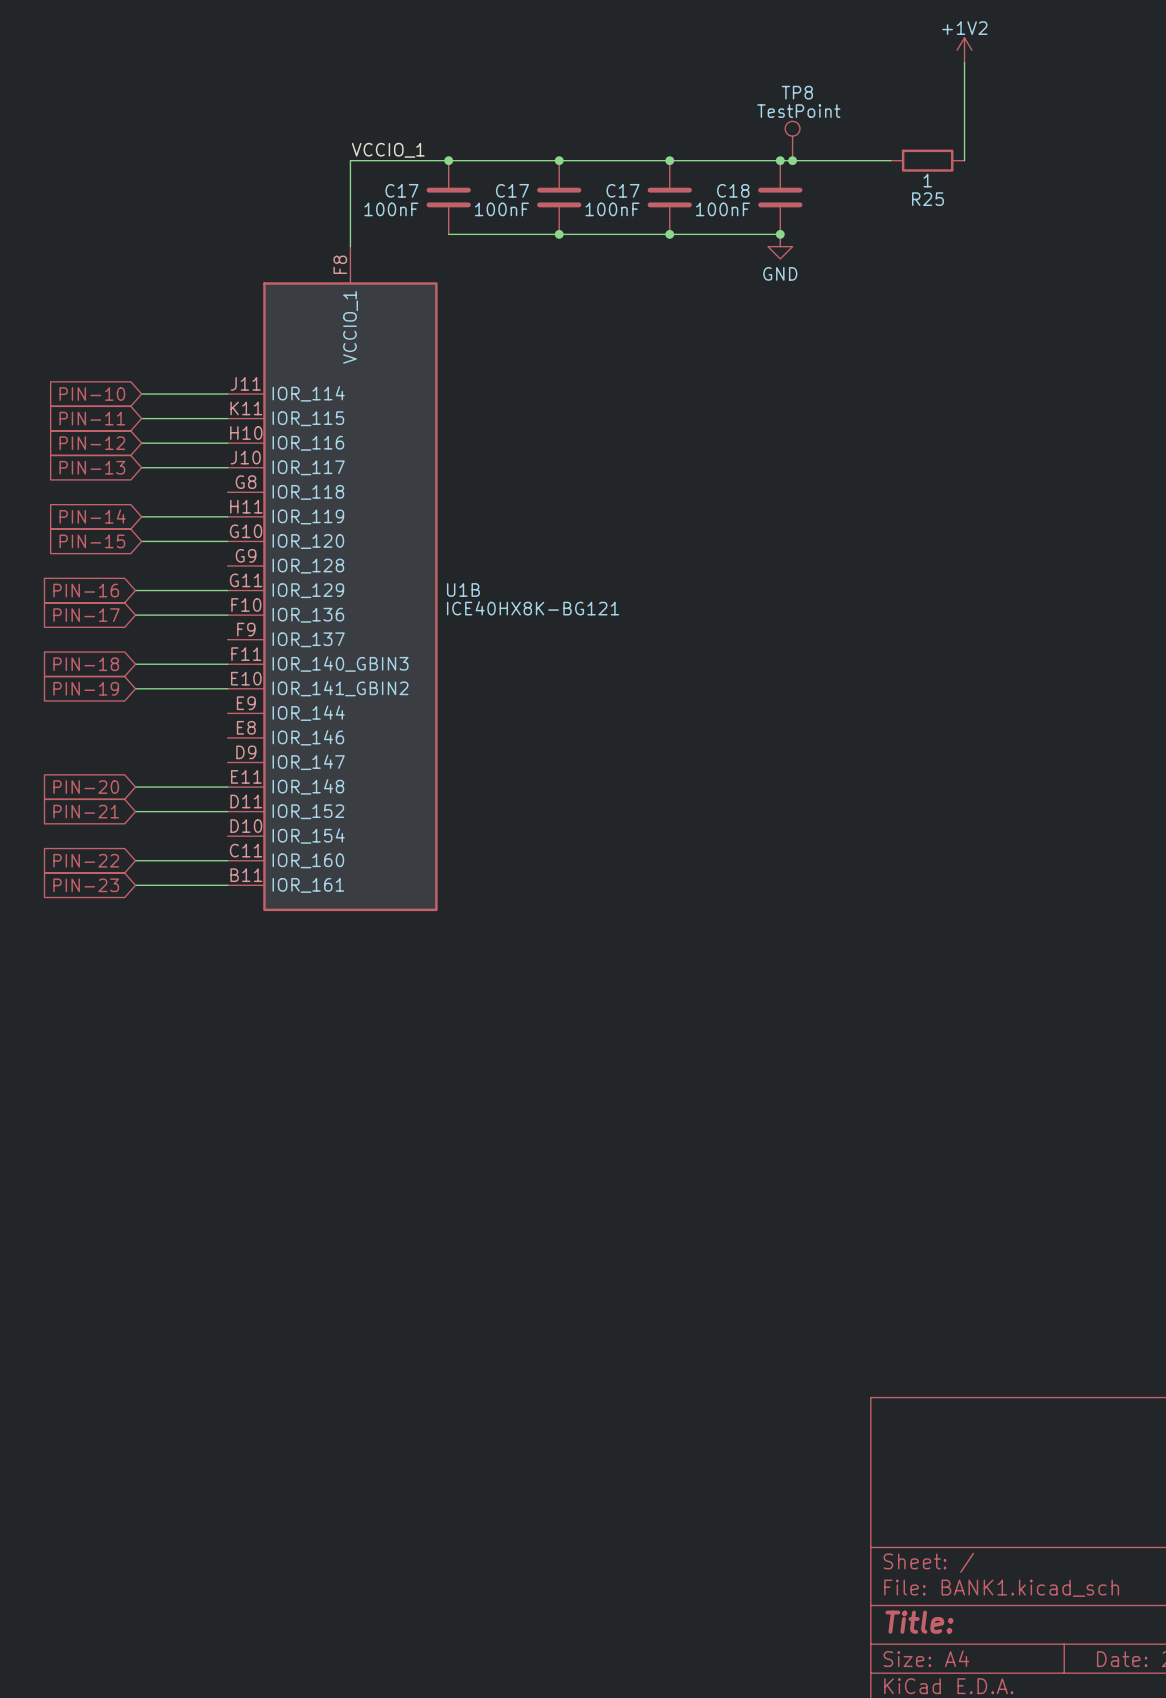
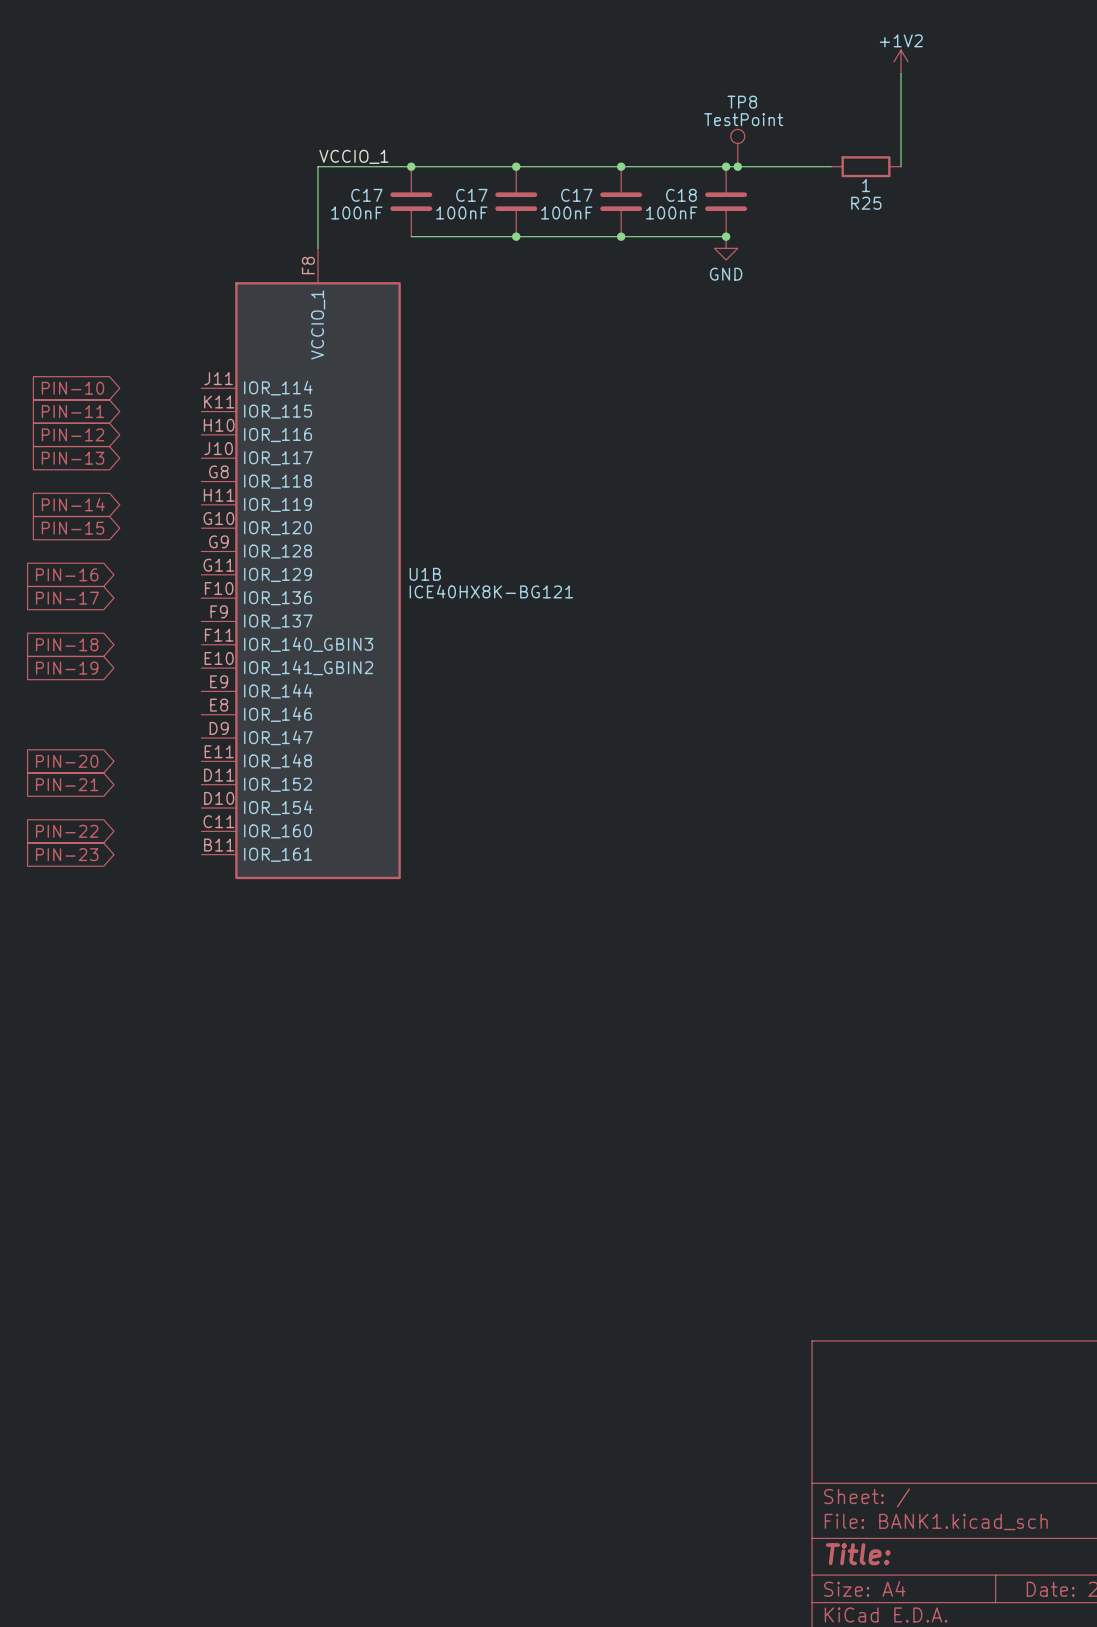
wire: (141, 394) (227, 394) -> none
wire: (141, 418) (227, 418) -> none
wire: (141, 443) (227, 443) -> none
wire: (141, 467) (227, 467) -> none
wire: (141, 516) (227, 516) -> none
wire: (141, 541) (227, 541) -> none
wire: (135, 590) (227, 590) -> none
wire: (135, 615) (227, 615) -> none
wire: (135, 664) (227, 664) -> none
wire: (135, 688) (227, 688) -> none
wire: (135, 787) (227, 787) -> none
wire: (135, 811) (227, 811) -> none
wire: (135, 860) (227, 860) -> none
wire: (135, 885) (227, 885) -> none

